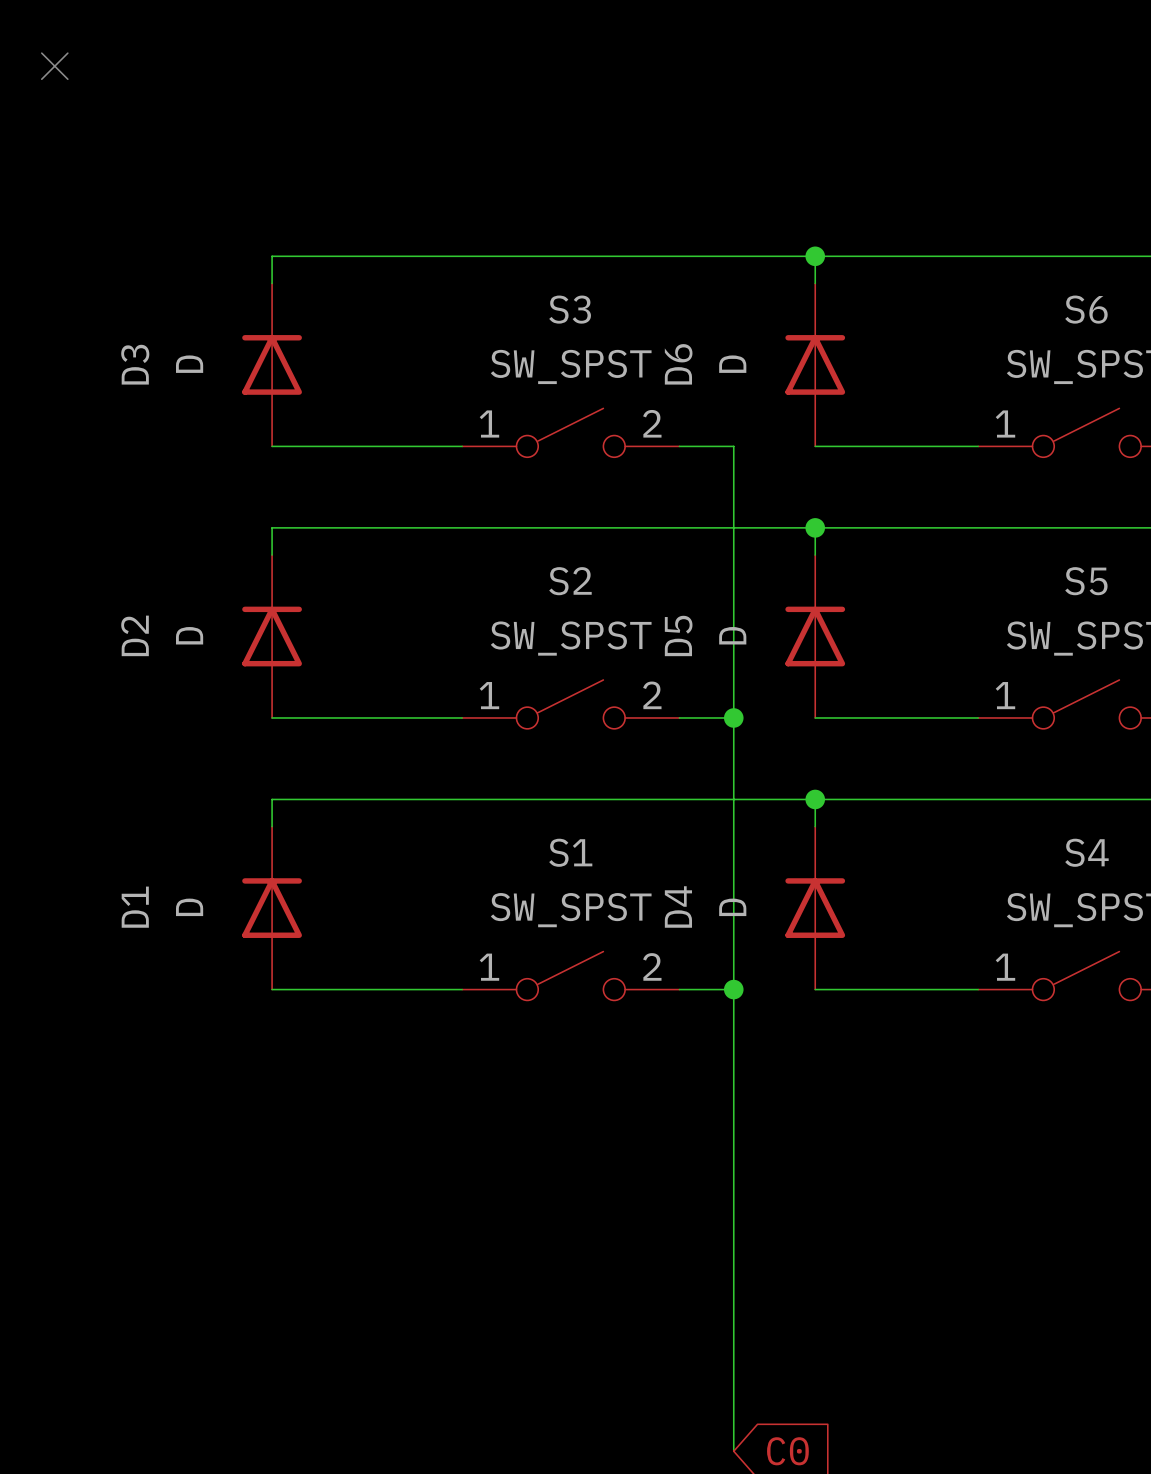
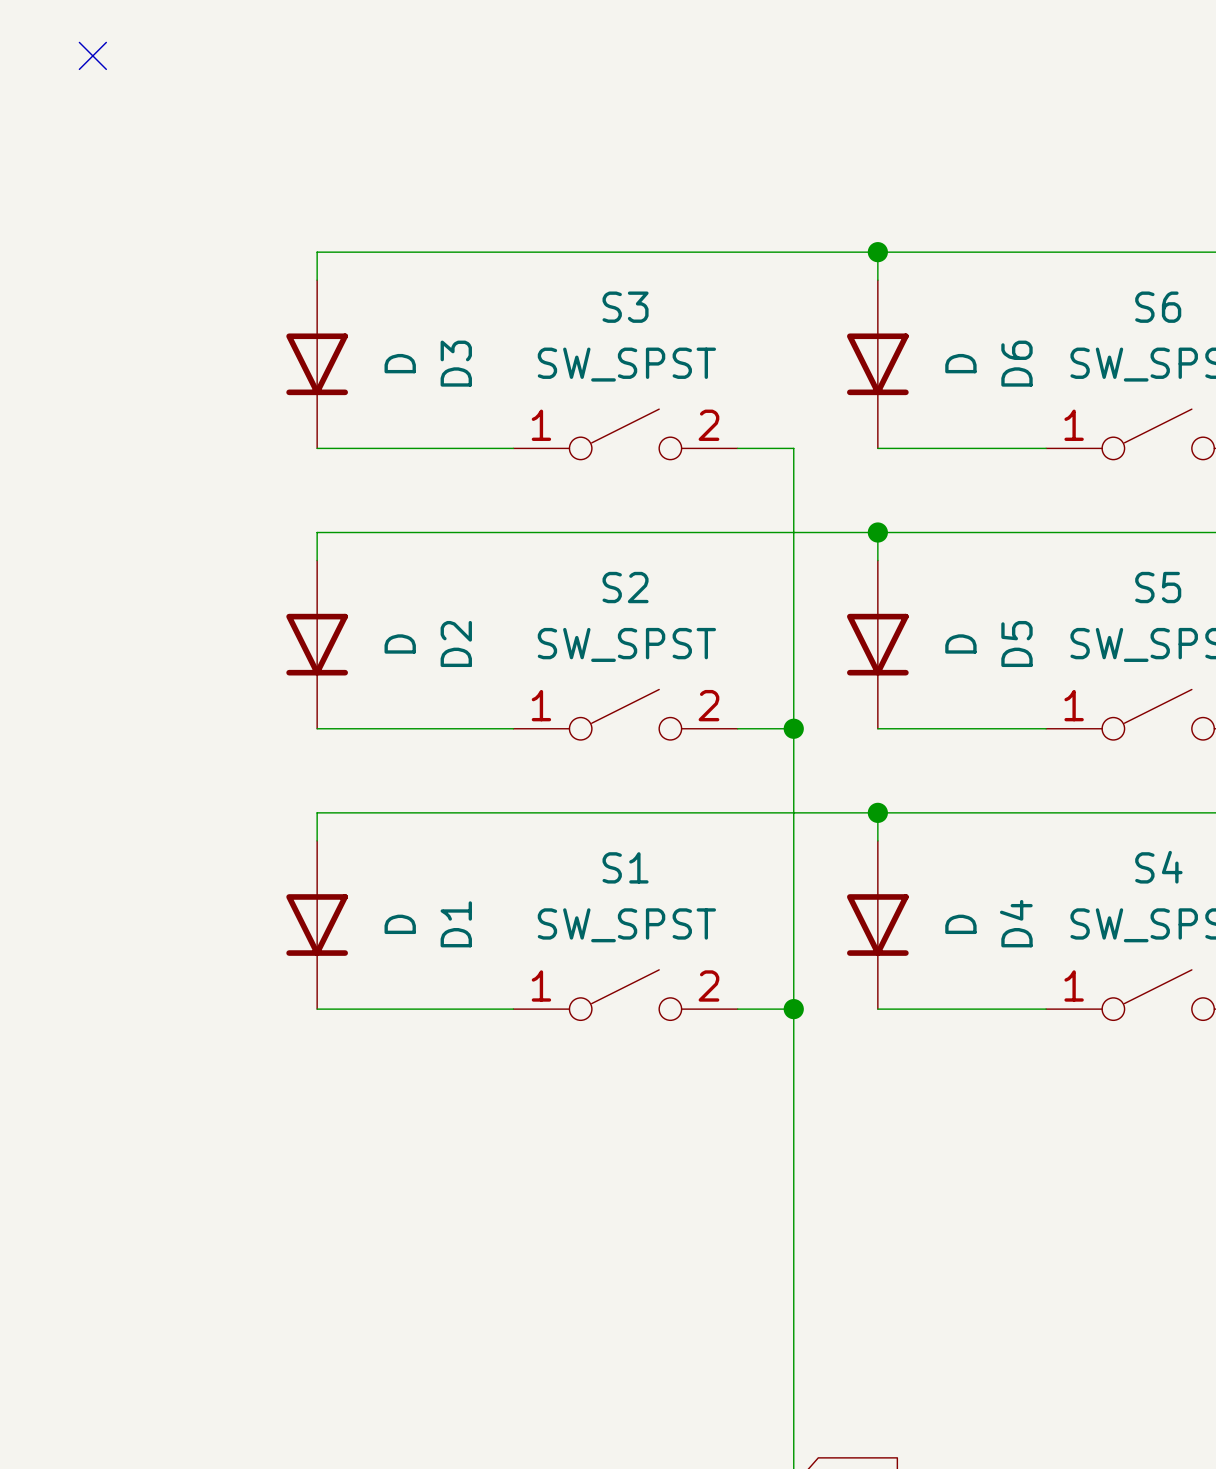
D3 rotation: 0° (272, 364) -> 180° (317, 364)
D6 rotation: 0° (815, 364) -> 180° (877, 364)
D2 rotation: 0° (272, 636) -> 180° (317, 644)
D5 rotation: 0° (815, 636) -> 180° (877, 644)
D1 rotation: 0° (272, 908) -> 180° (317, 925)
D4 rotation: 0° (815, 908) -> 180° (877, 925)

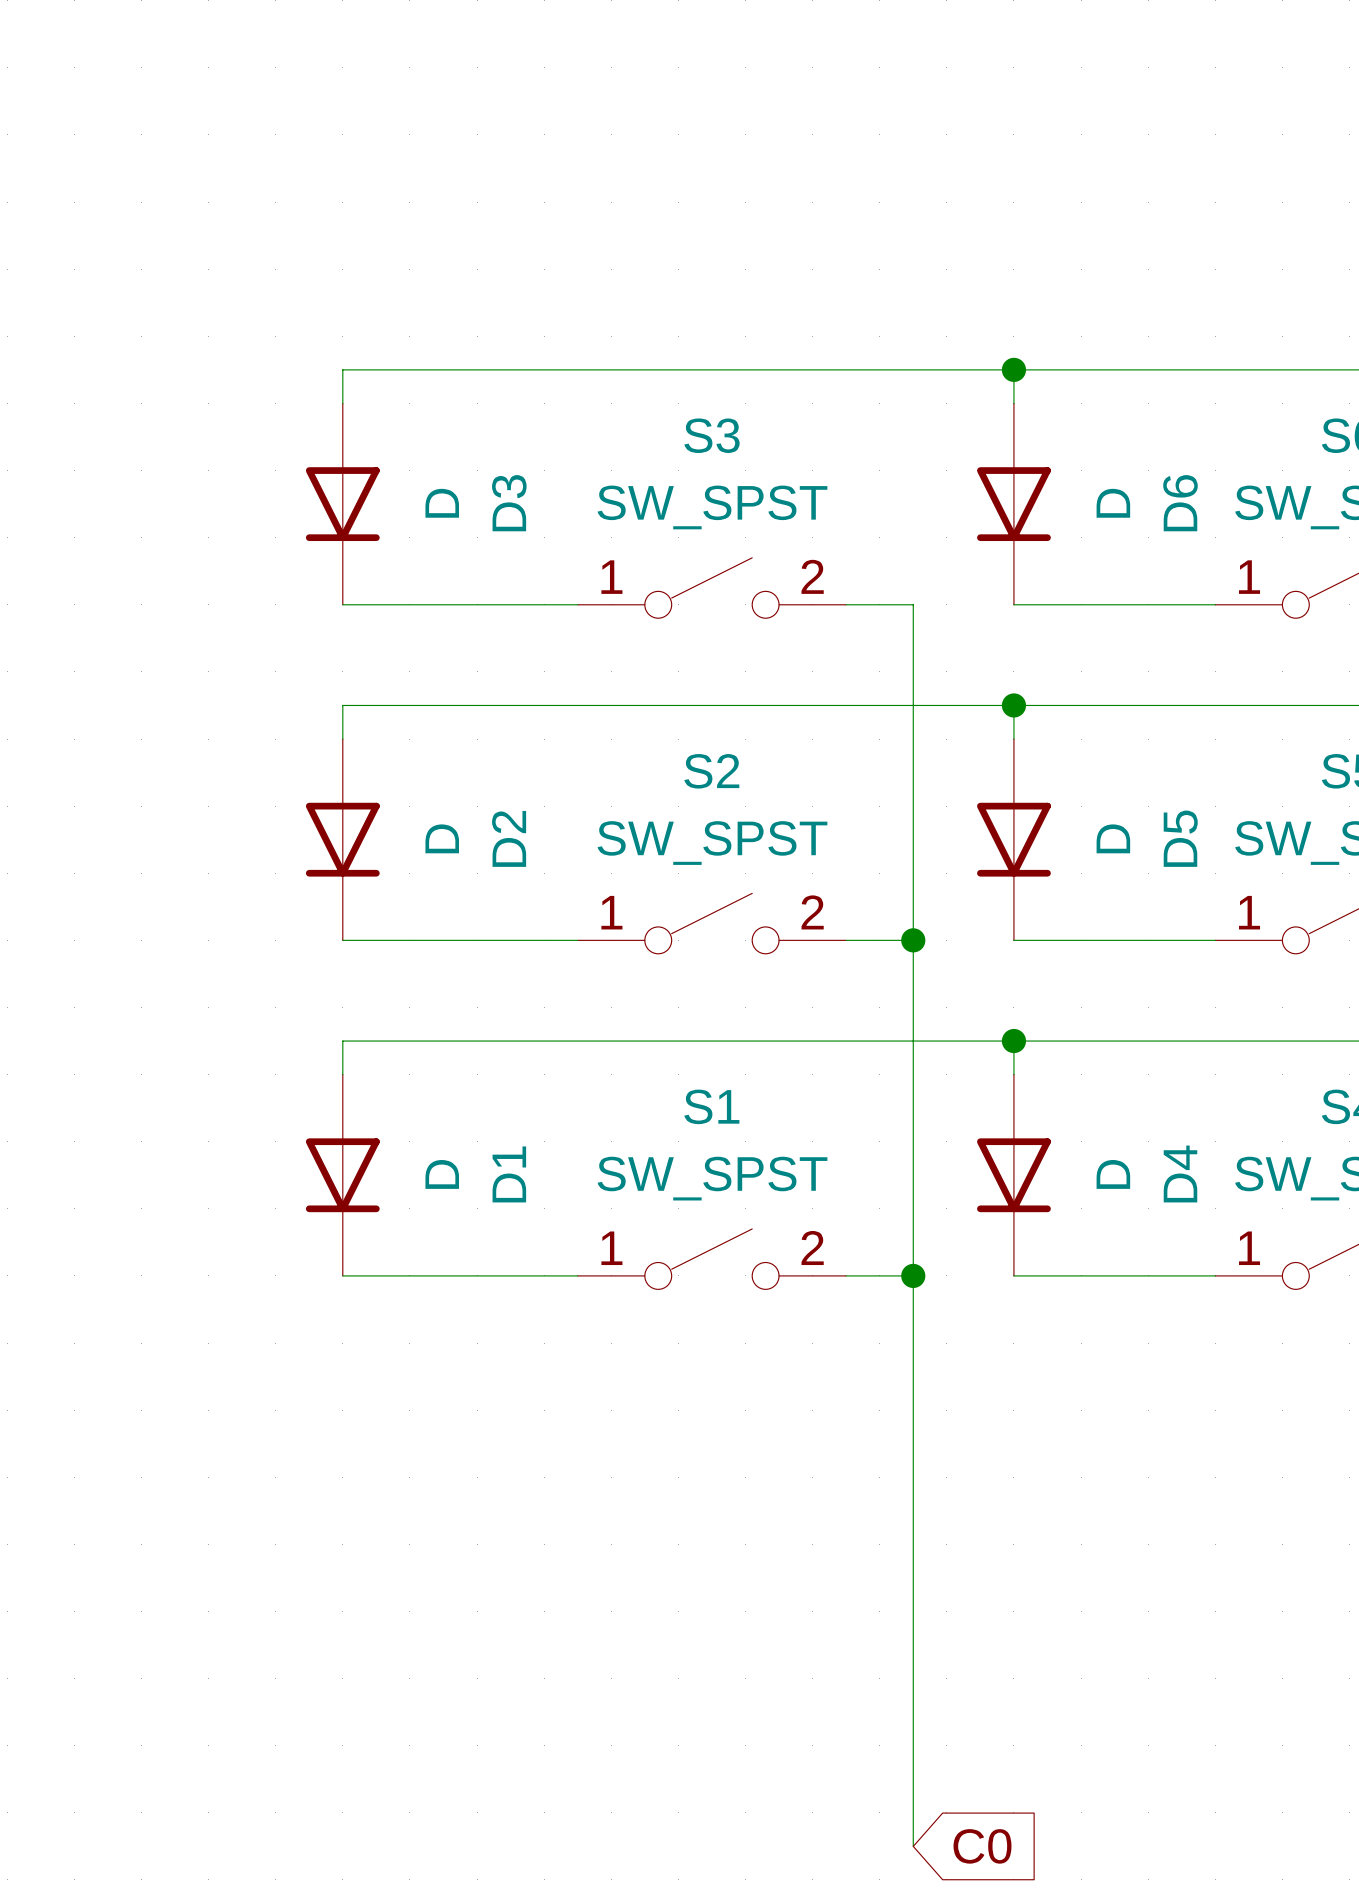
no-connect mark: (92, 55) -> none

